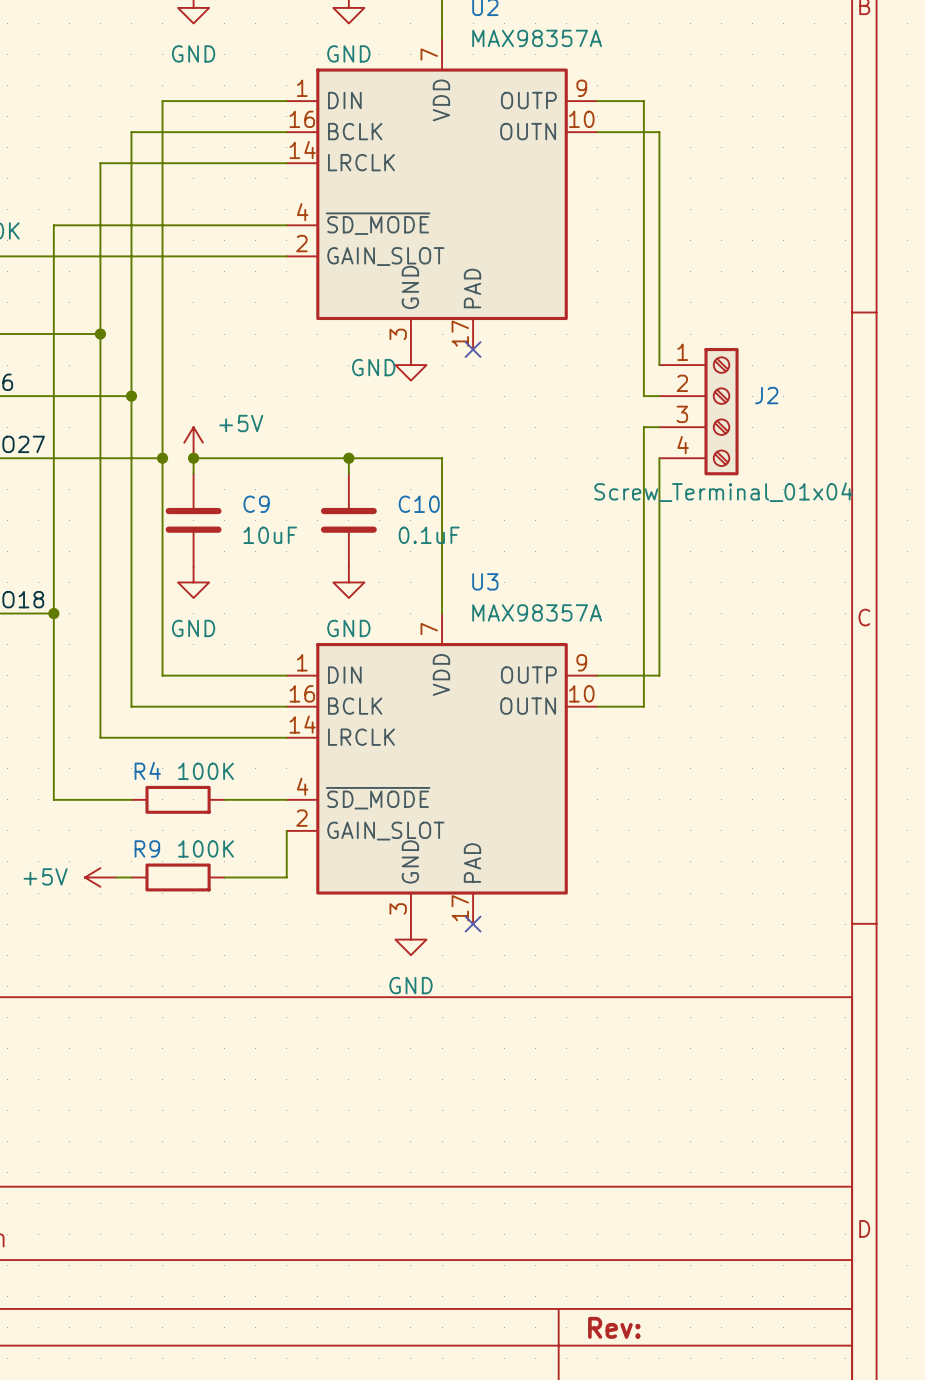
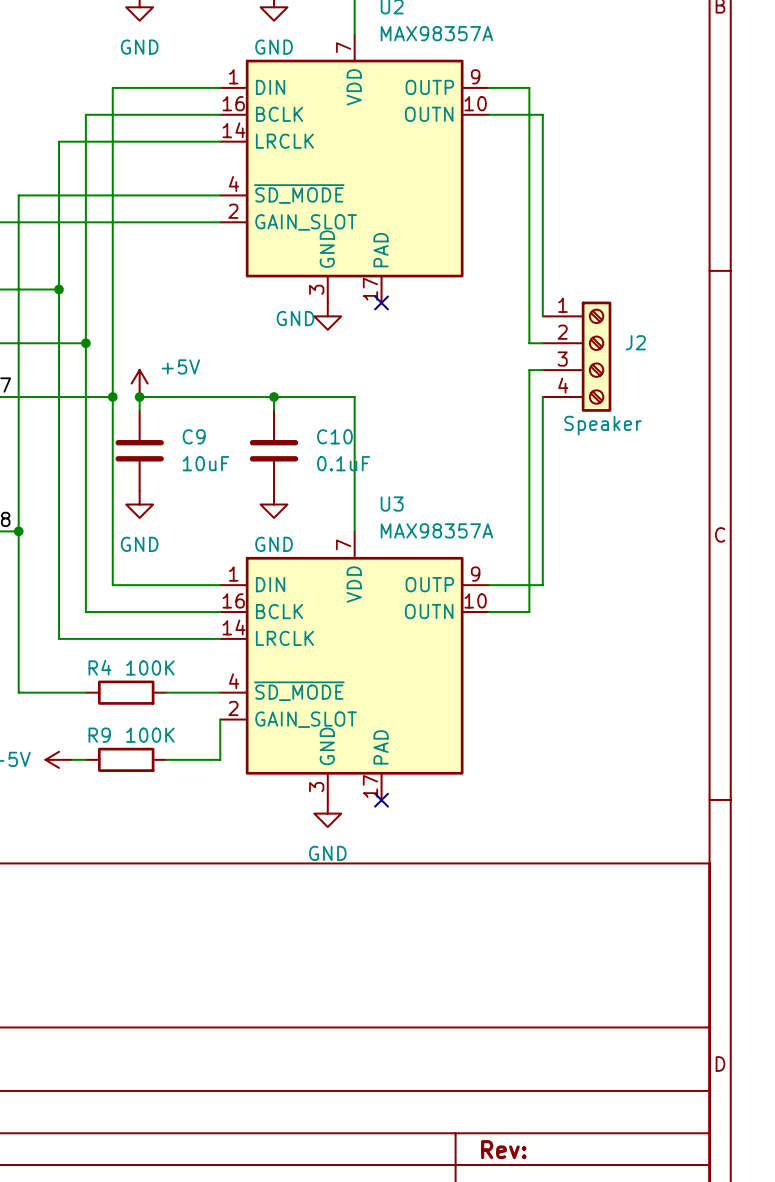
J2 value: Screw_Terminal_01x04 (723, 492) -> Speaker (603, 425)

